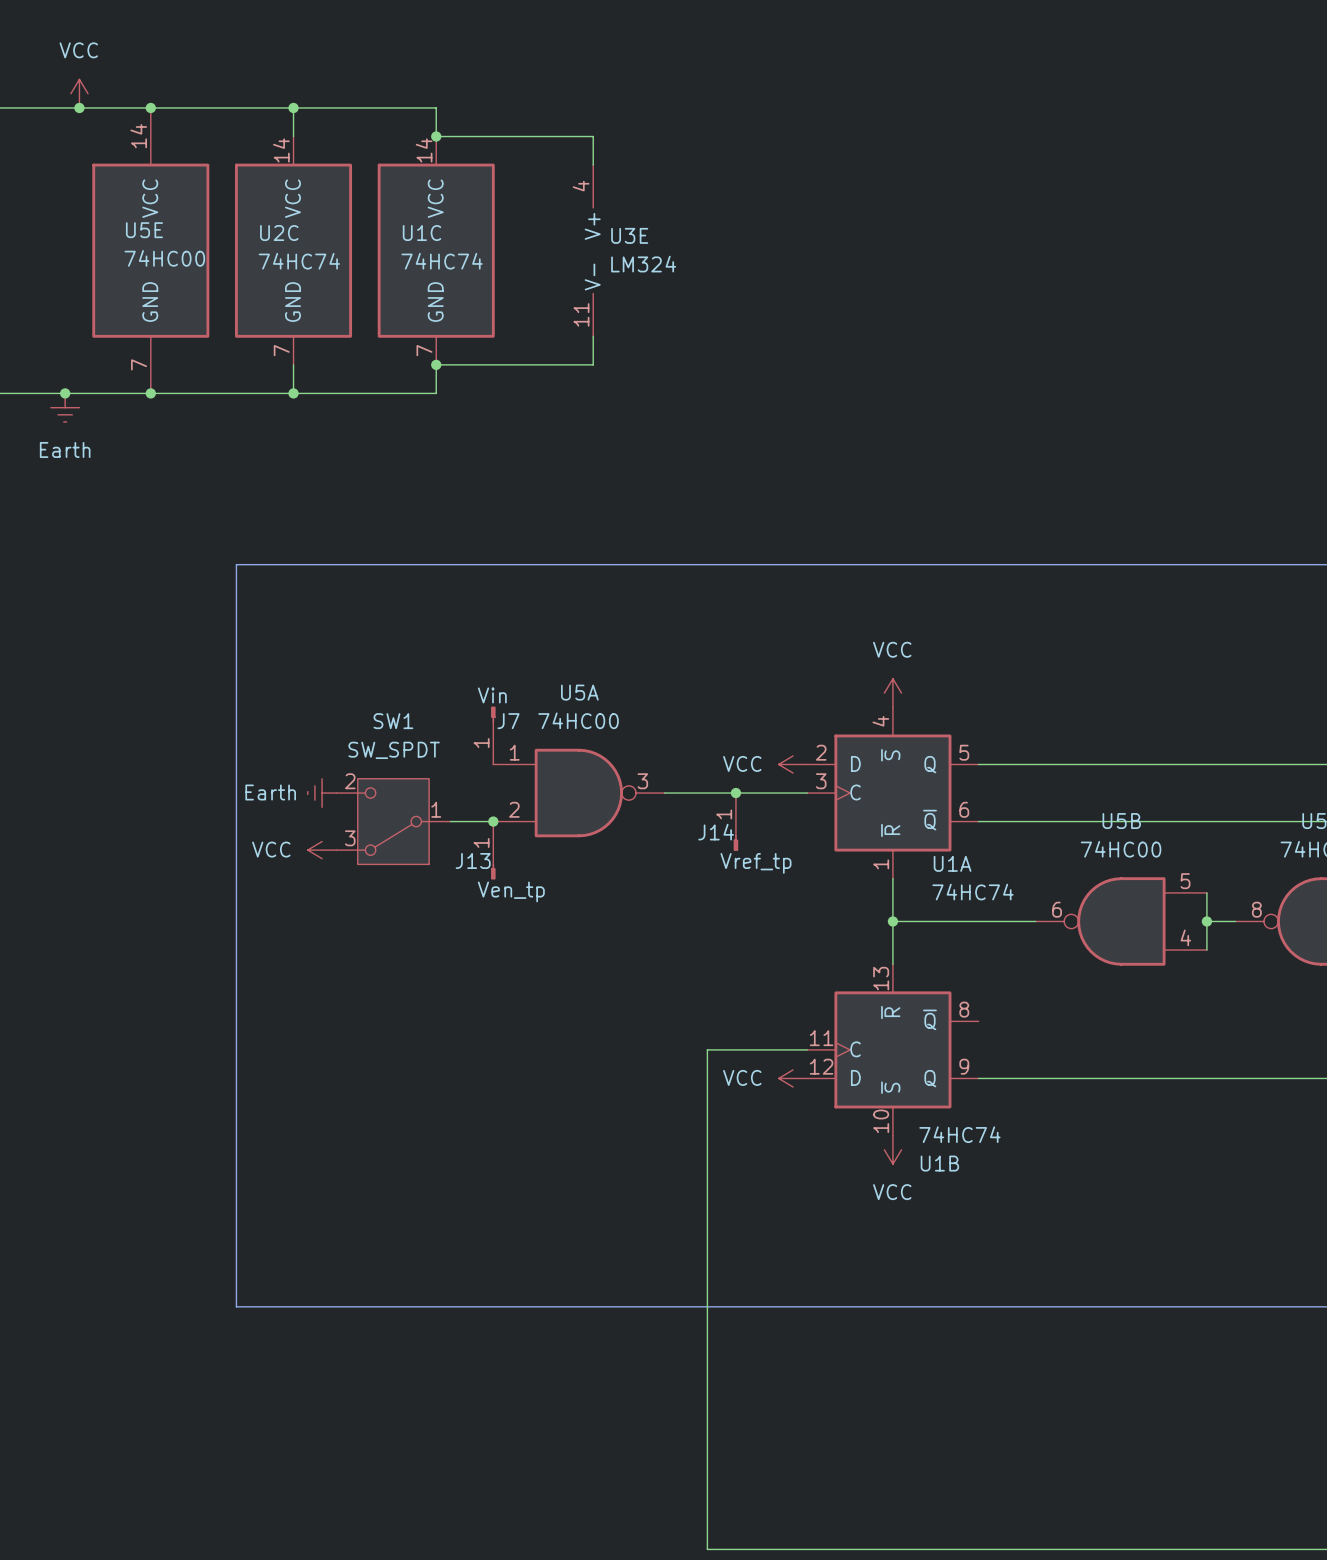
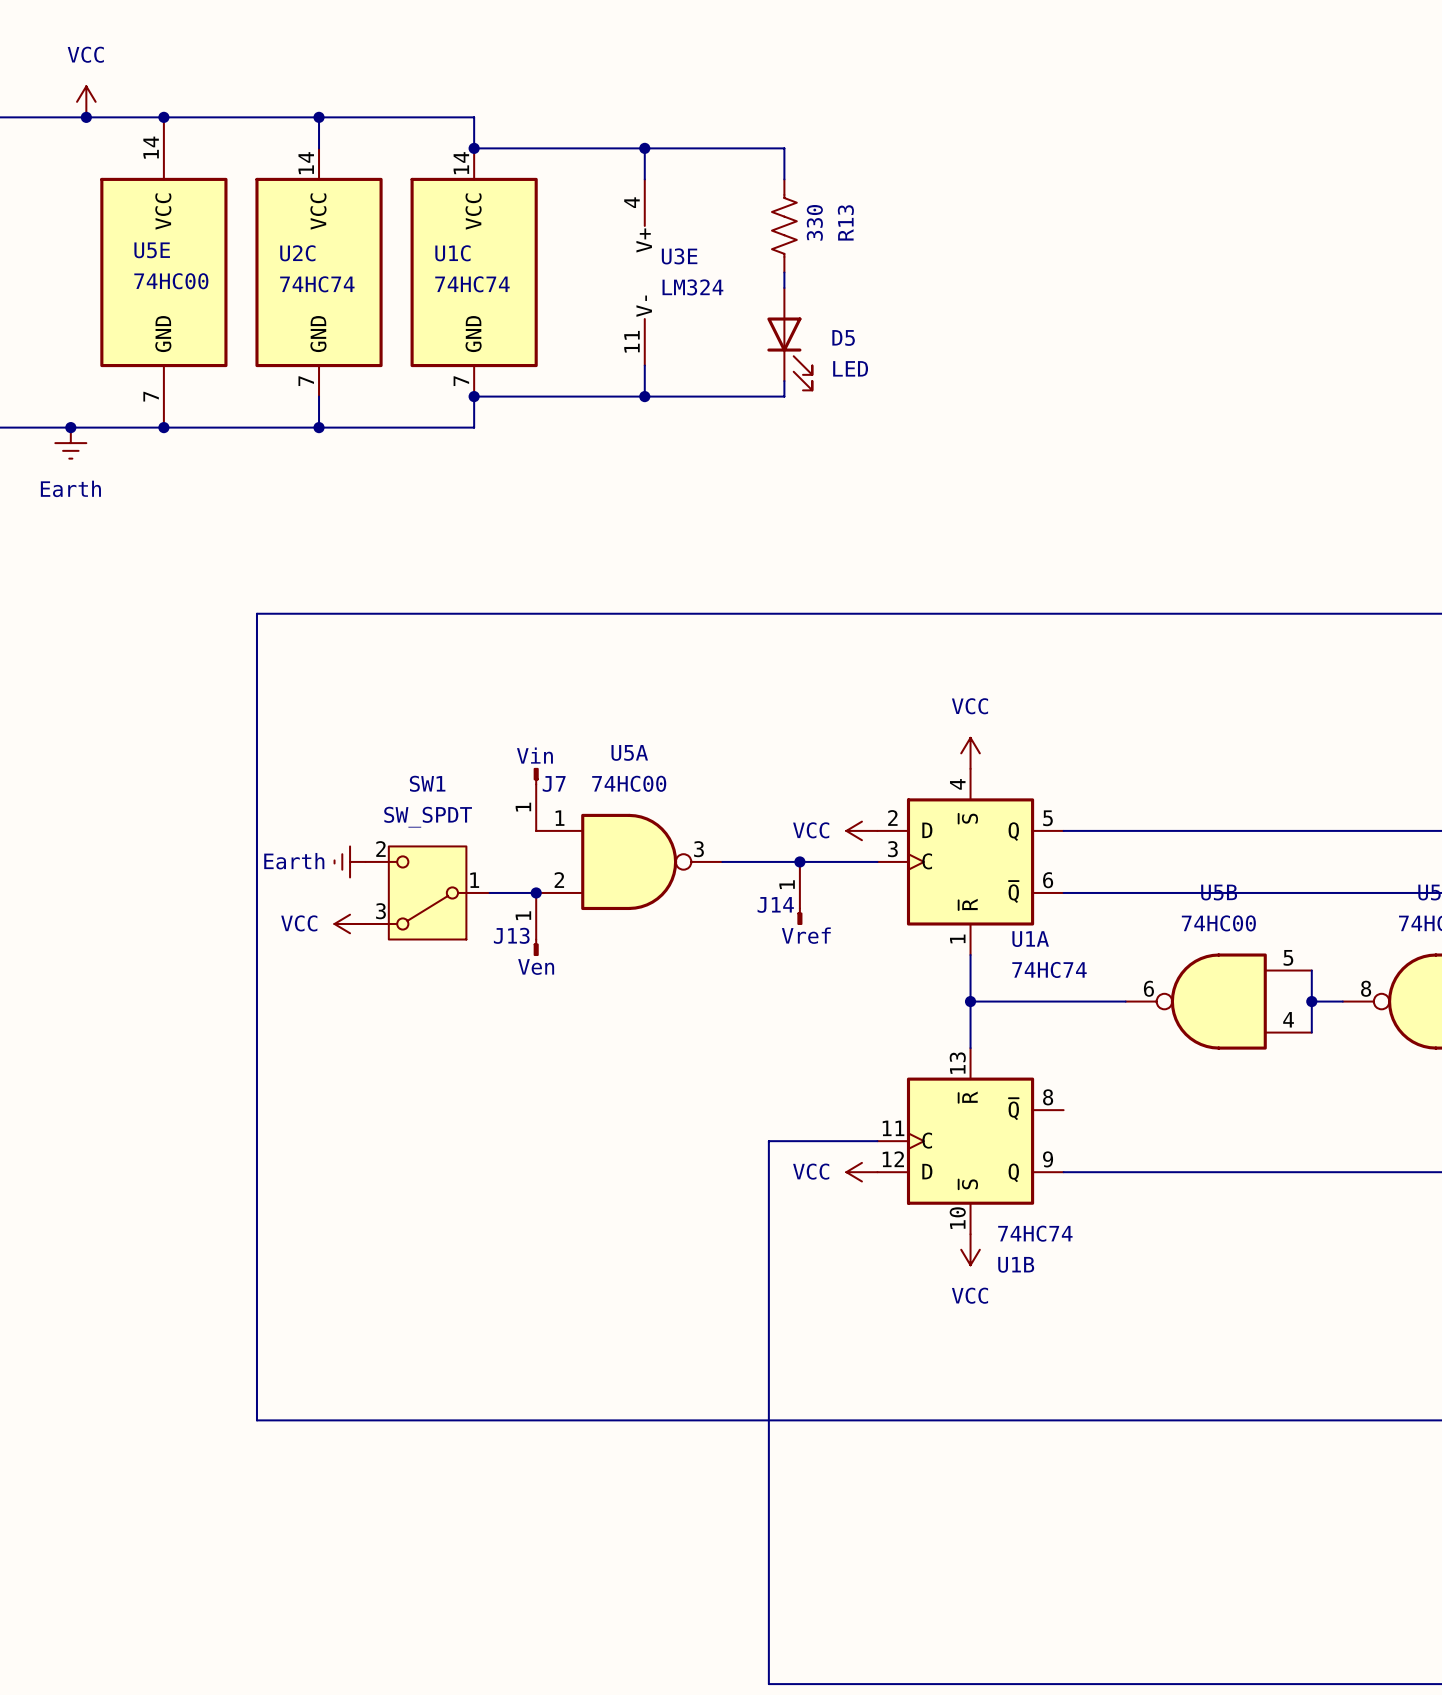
wire: none -> (644, 148) (784, 148) (784, 179)
junction: none -> (644, 148)
R13: none -> 330 (784, 225)
wire: none -> (784, 272) (784, 287)
D5: none -> LED (789, 339)
wire: none -> (784, 381) (784, 396) (644, 396)
junction: none -> (644, 396)
J14 value: Vref_tp (755, 863) -> Vref (806, 935)
J13 value: Ven_tp (511, 891) -> Ven (536, 967)

